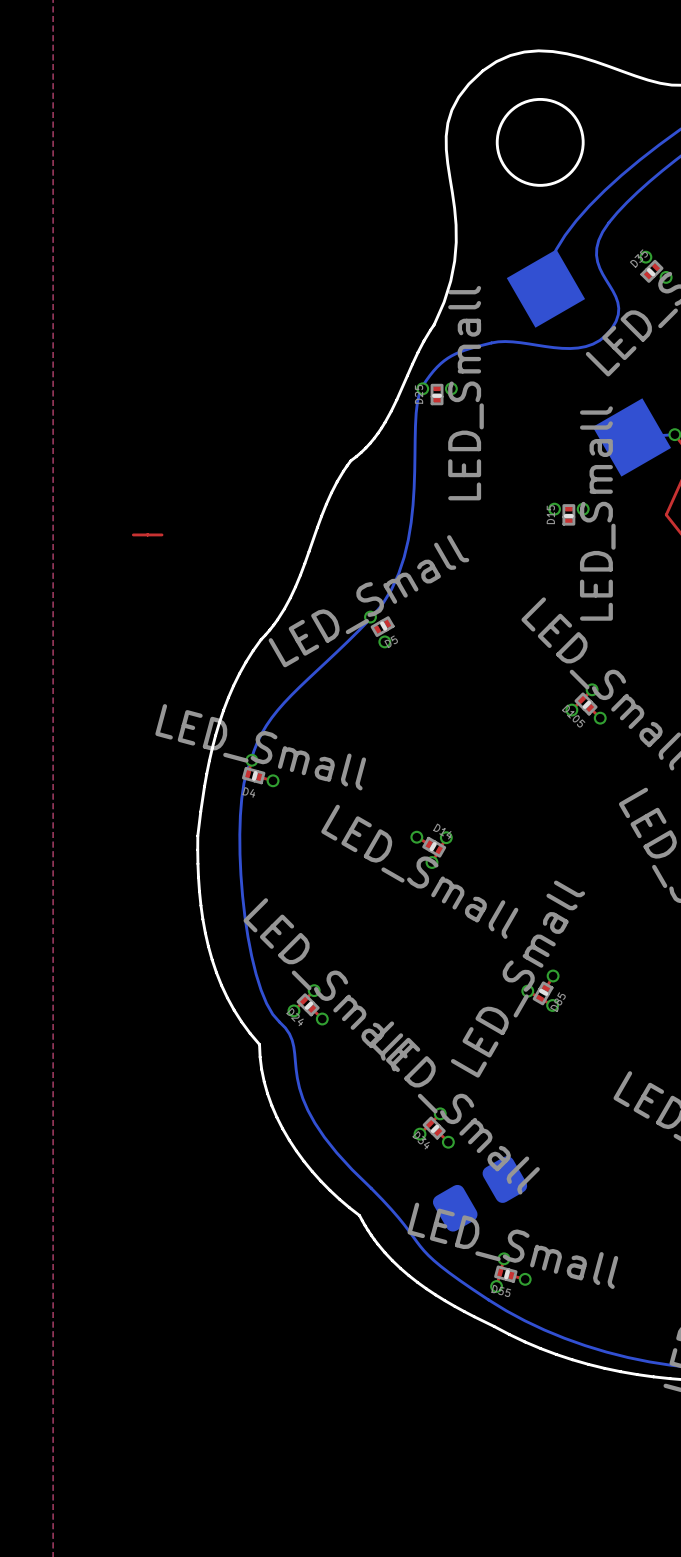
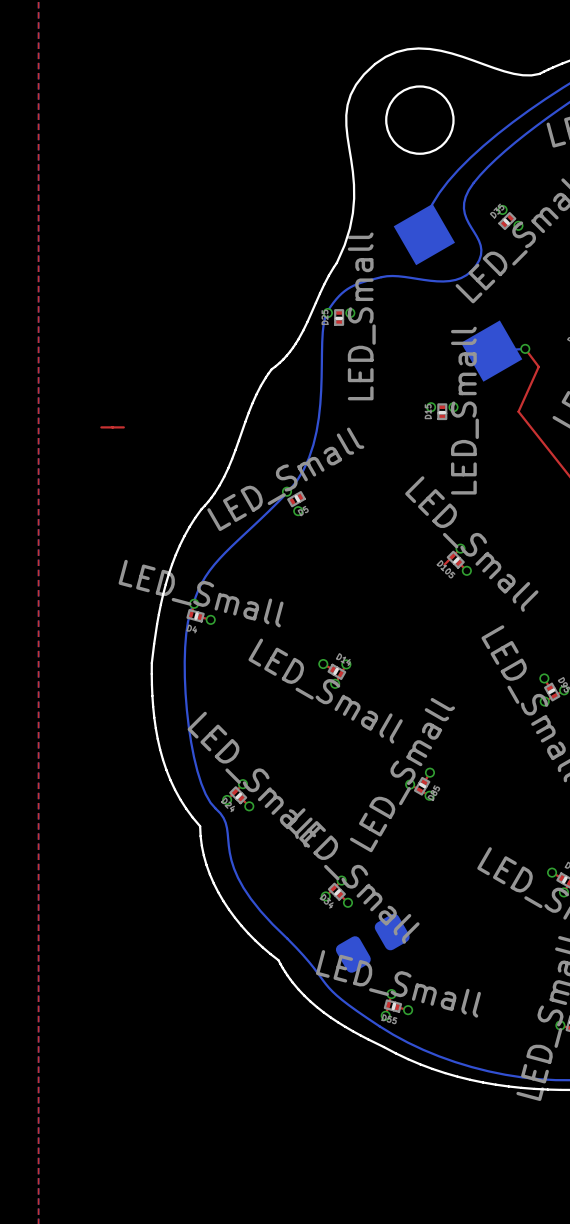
via: (571, 710) -> none

